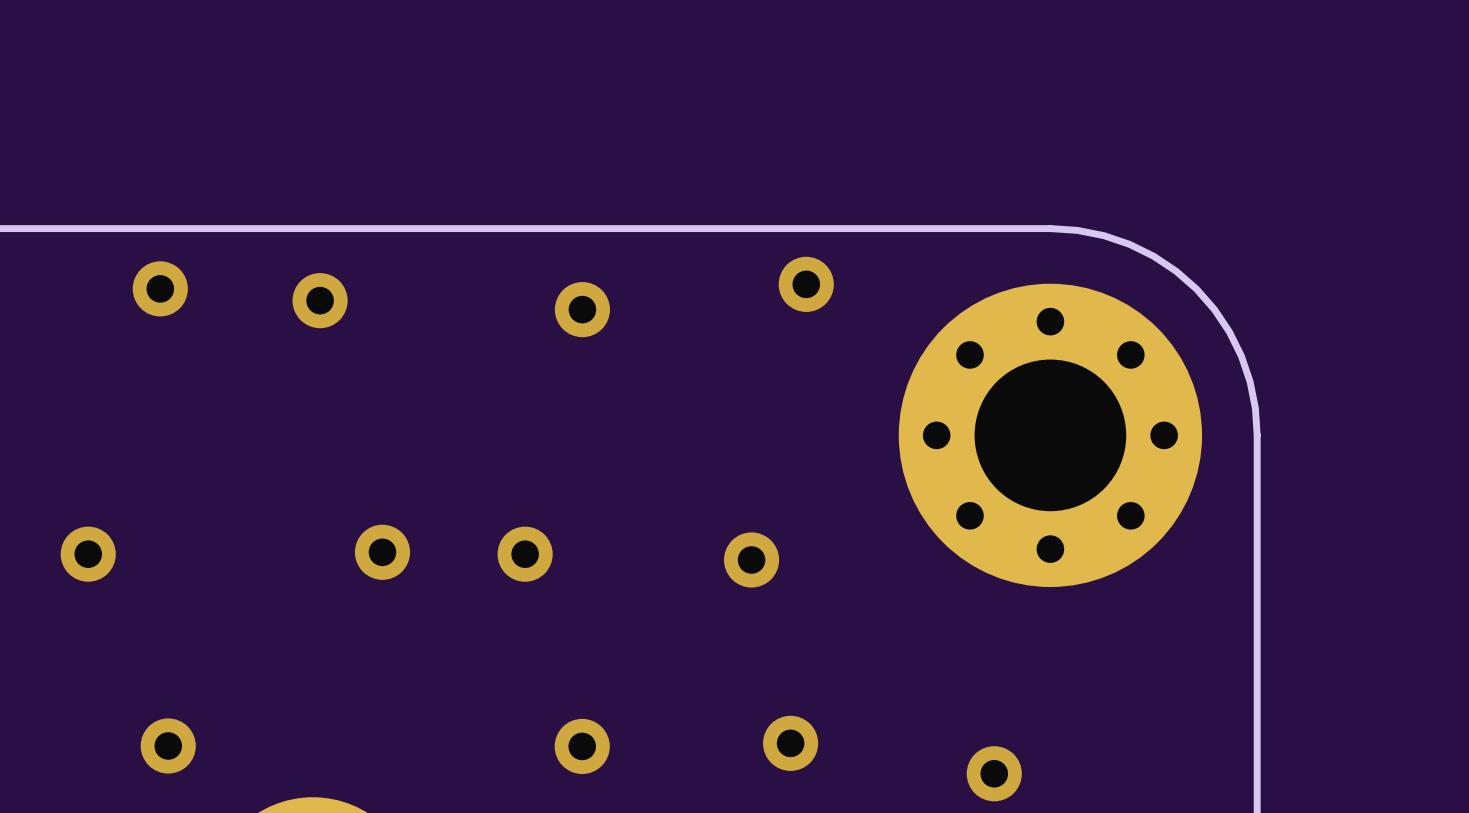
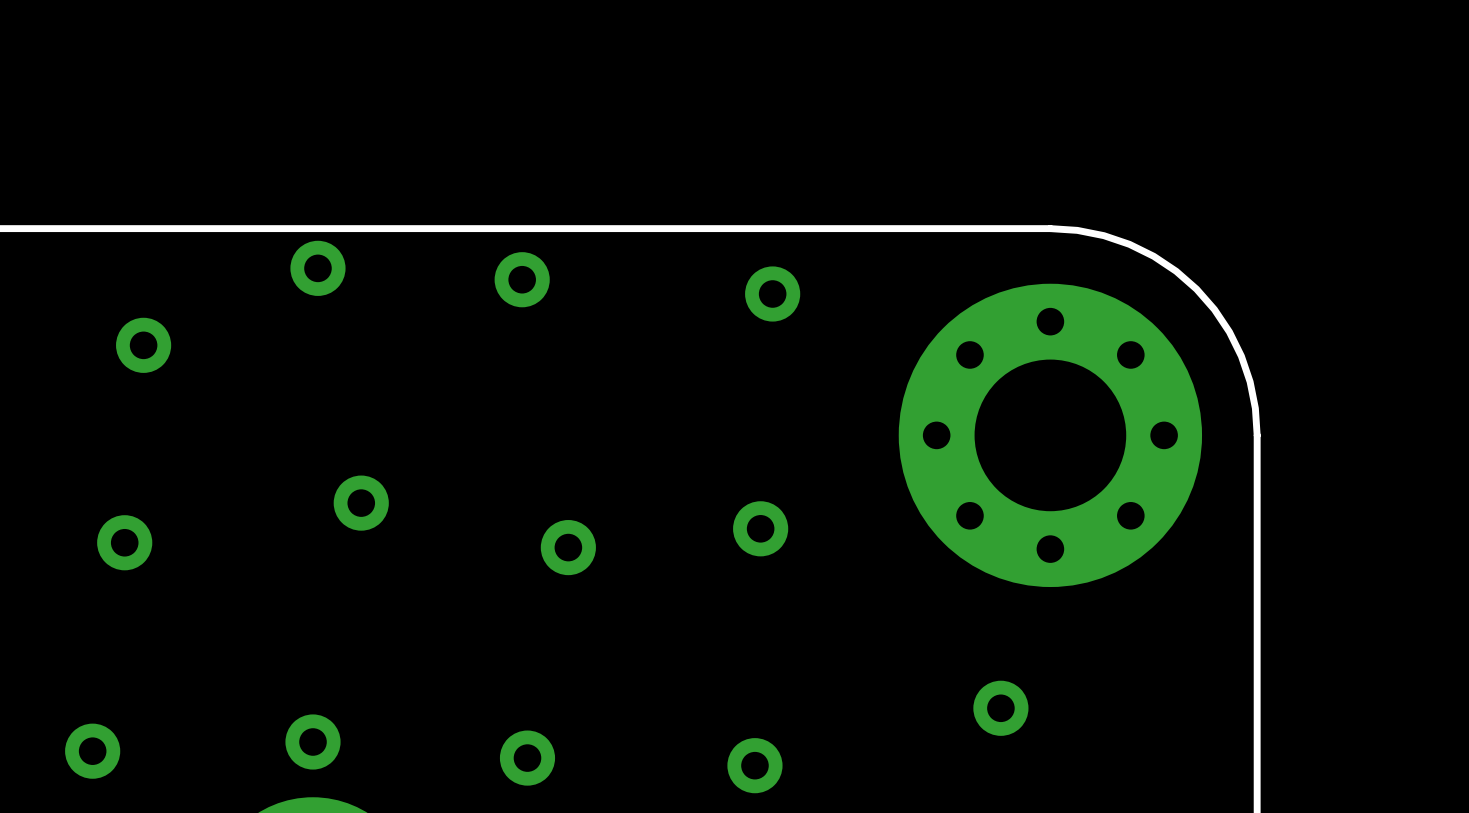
via position: (806, 284) -> (772, 293)
via position: (160, 288) -> (143, 345)
via position: (320, 300) -> (317, 268)
via position: (582, 309) -> (522, 279)
via position: (382, 552) -> (361, 503)
via position: (88, 554) -> (124, 542)
via position: (525, 554) -> (568, 547)
via position: (751, 559) -> (760, 528)
via: none -> (313, 742)
via position: (790, 743) -> (754, 765)
via: (168, 745) -> none
via position: (582, 746) -> (527, 758)
via: none -> (92, 751)
via position: (994, 773) -> (1000, 708)

